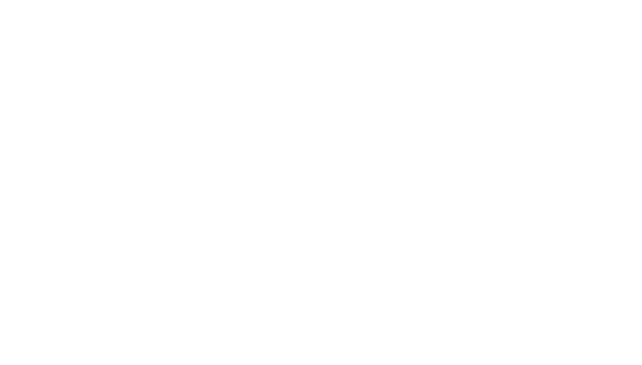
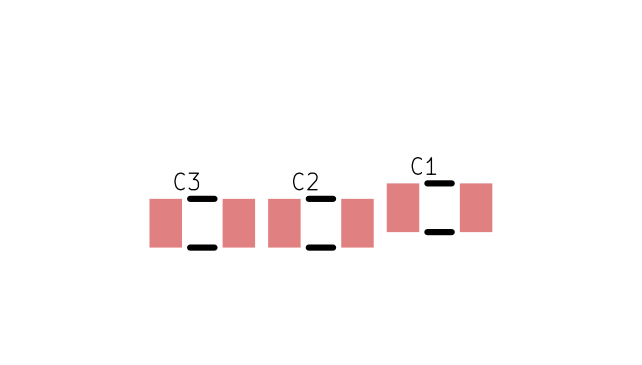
C1: none -> (439, 207)
C3: none -> (202, 223)
C2: none -> (320, 223)

